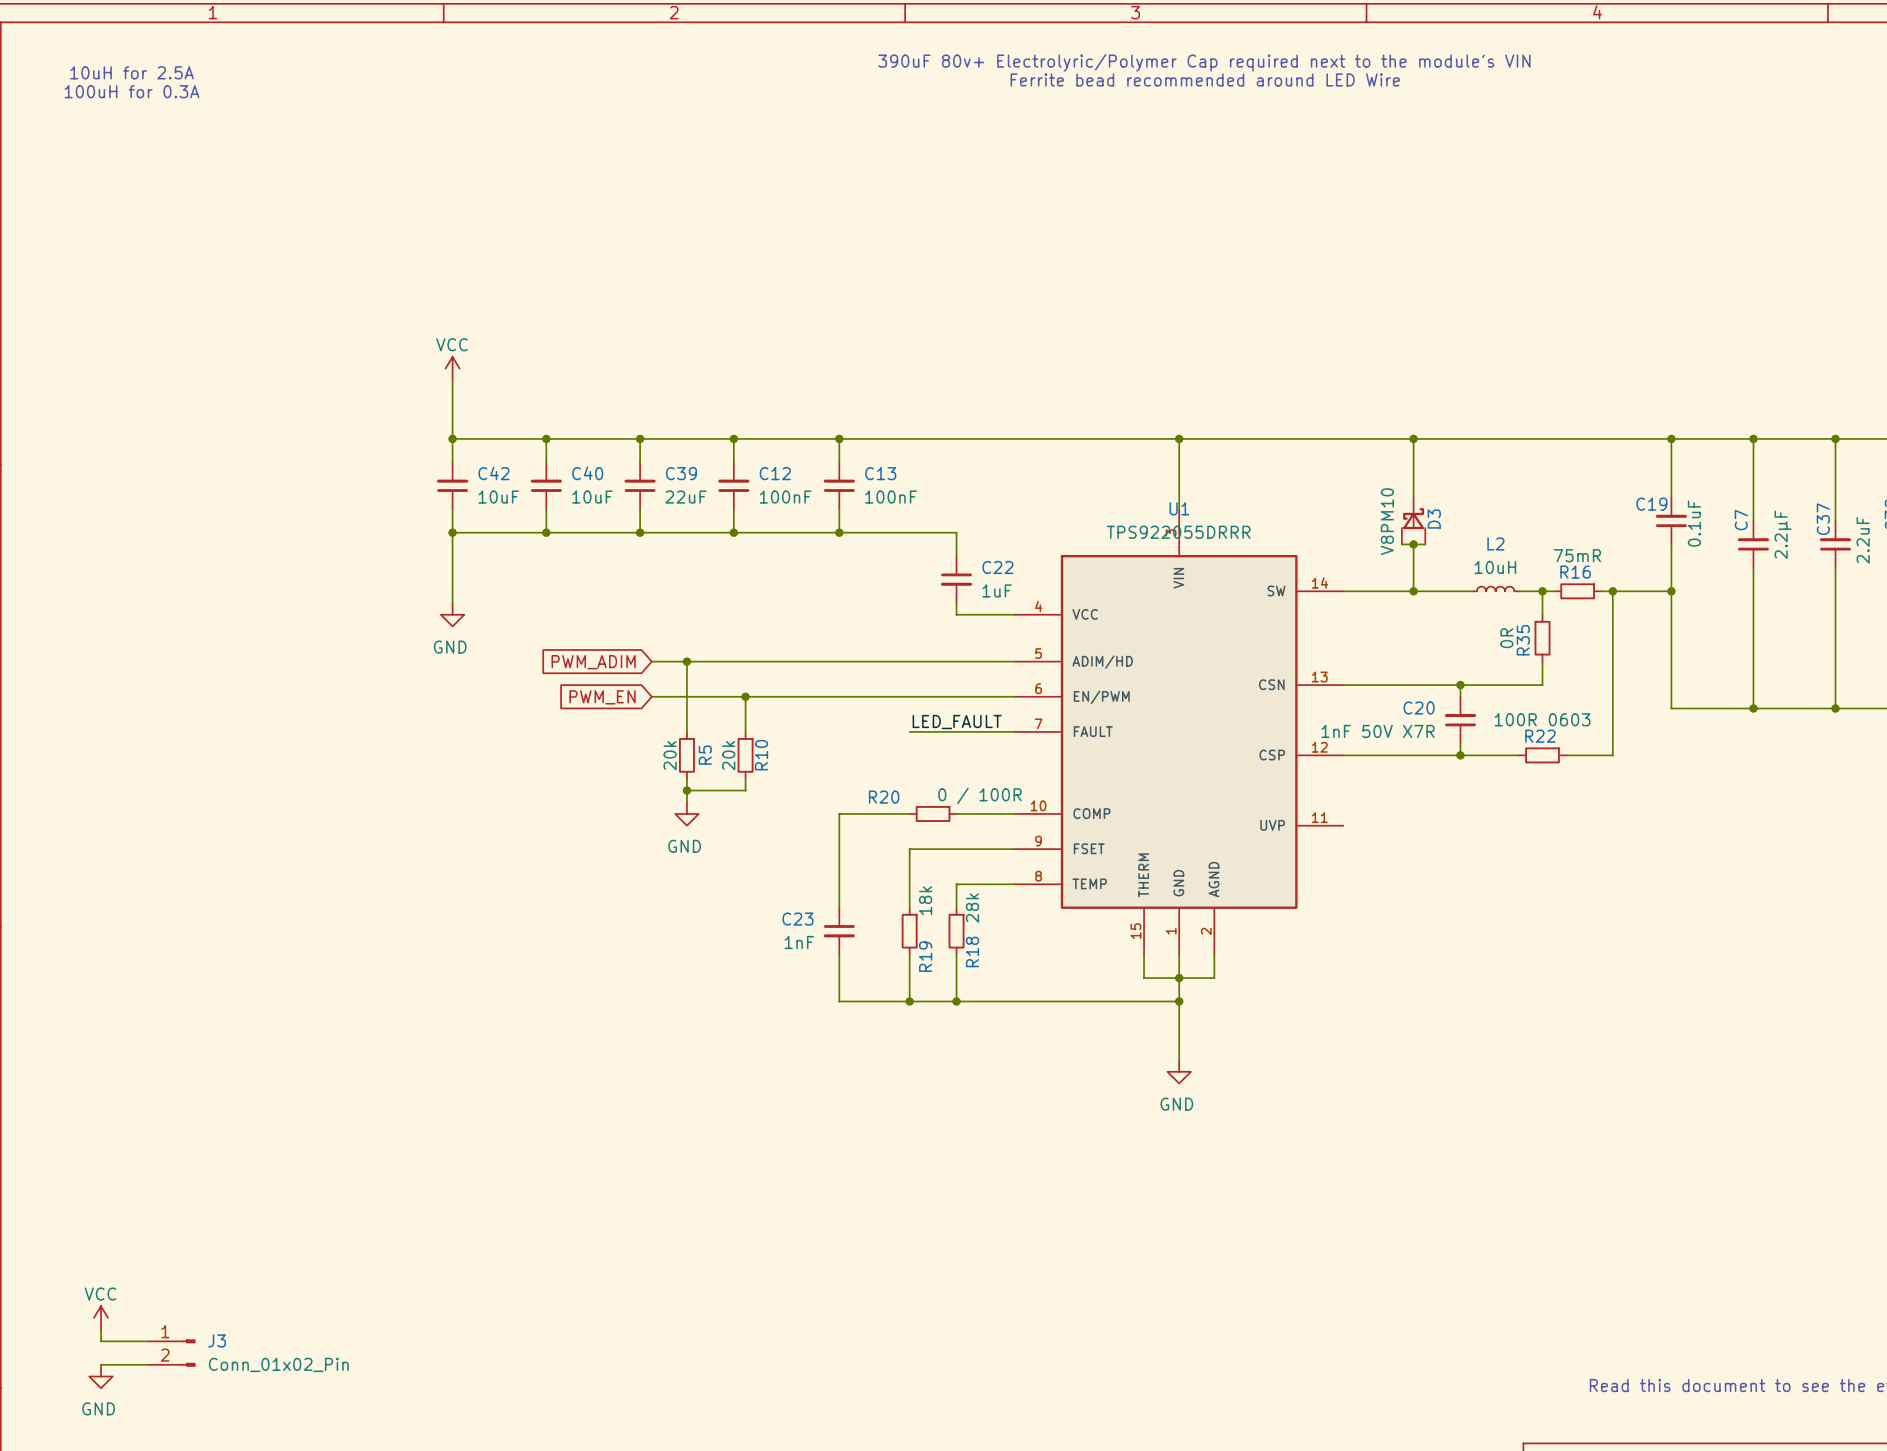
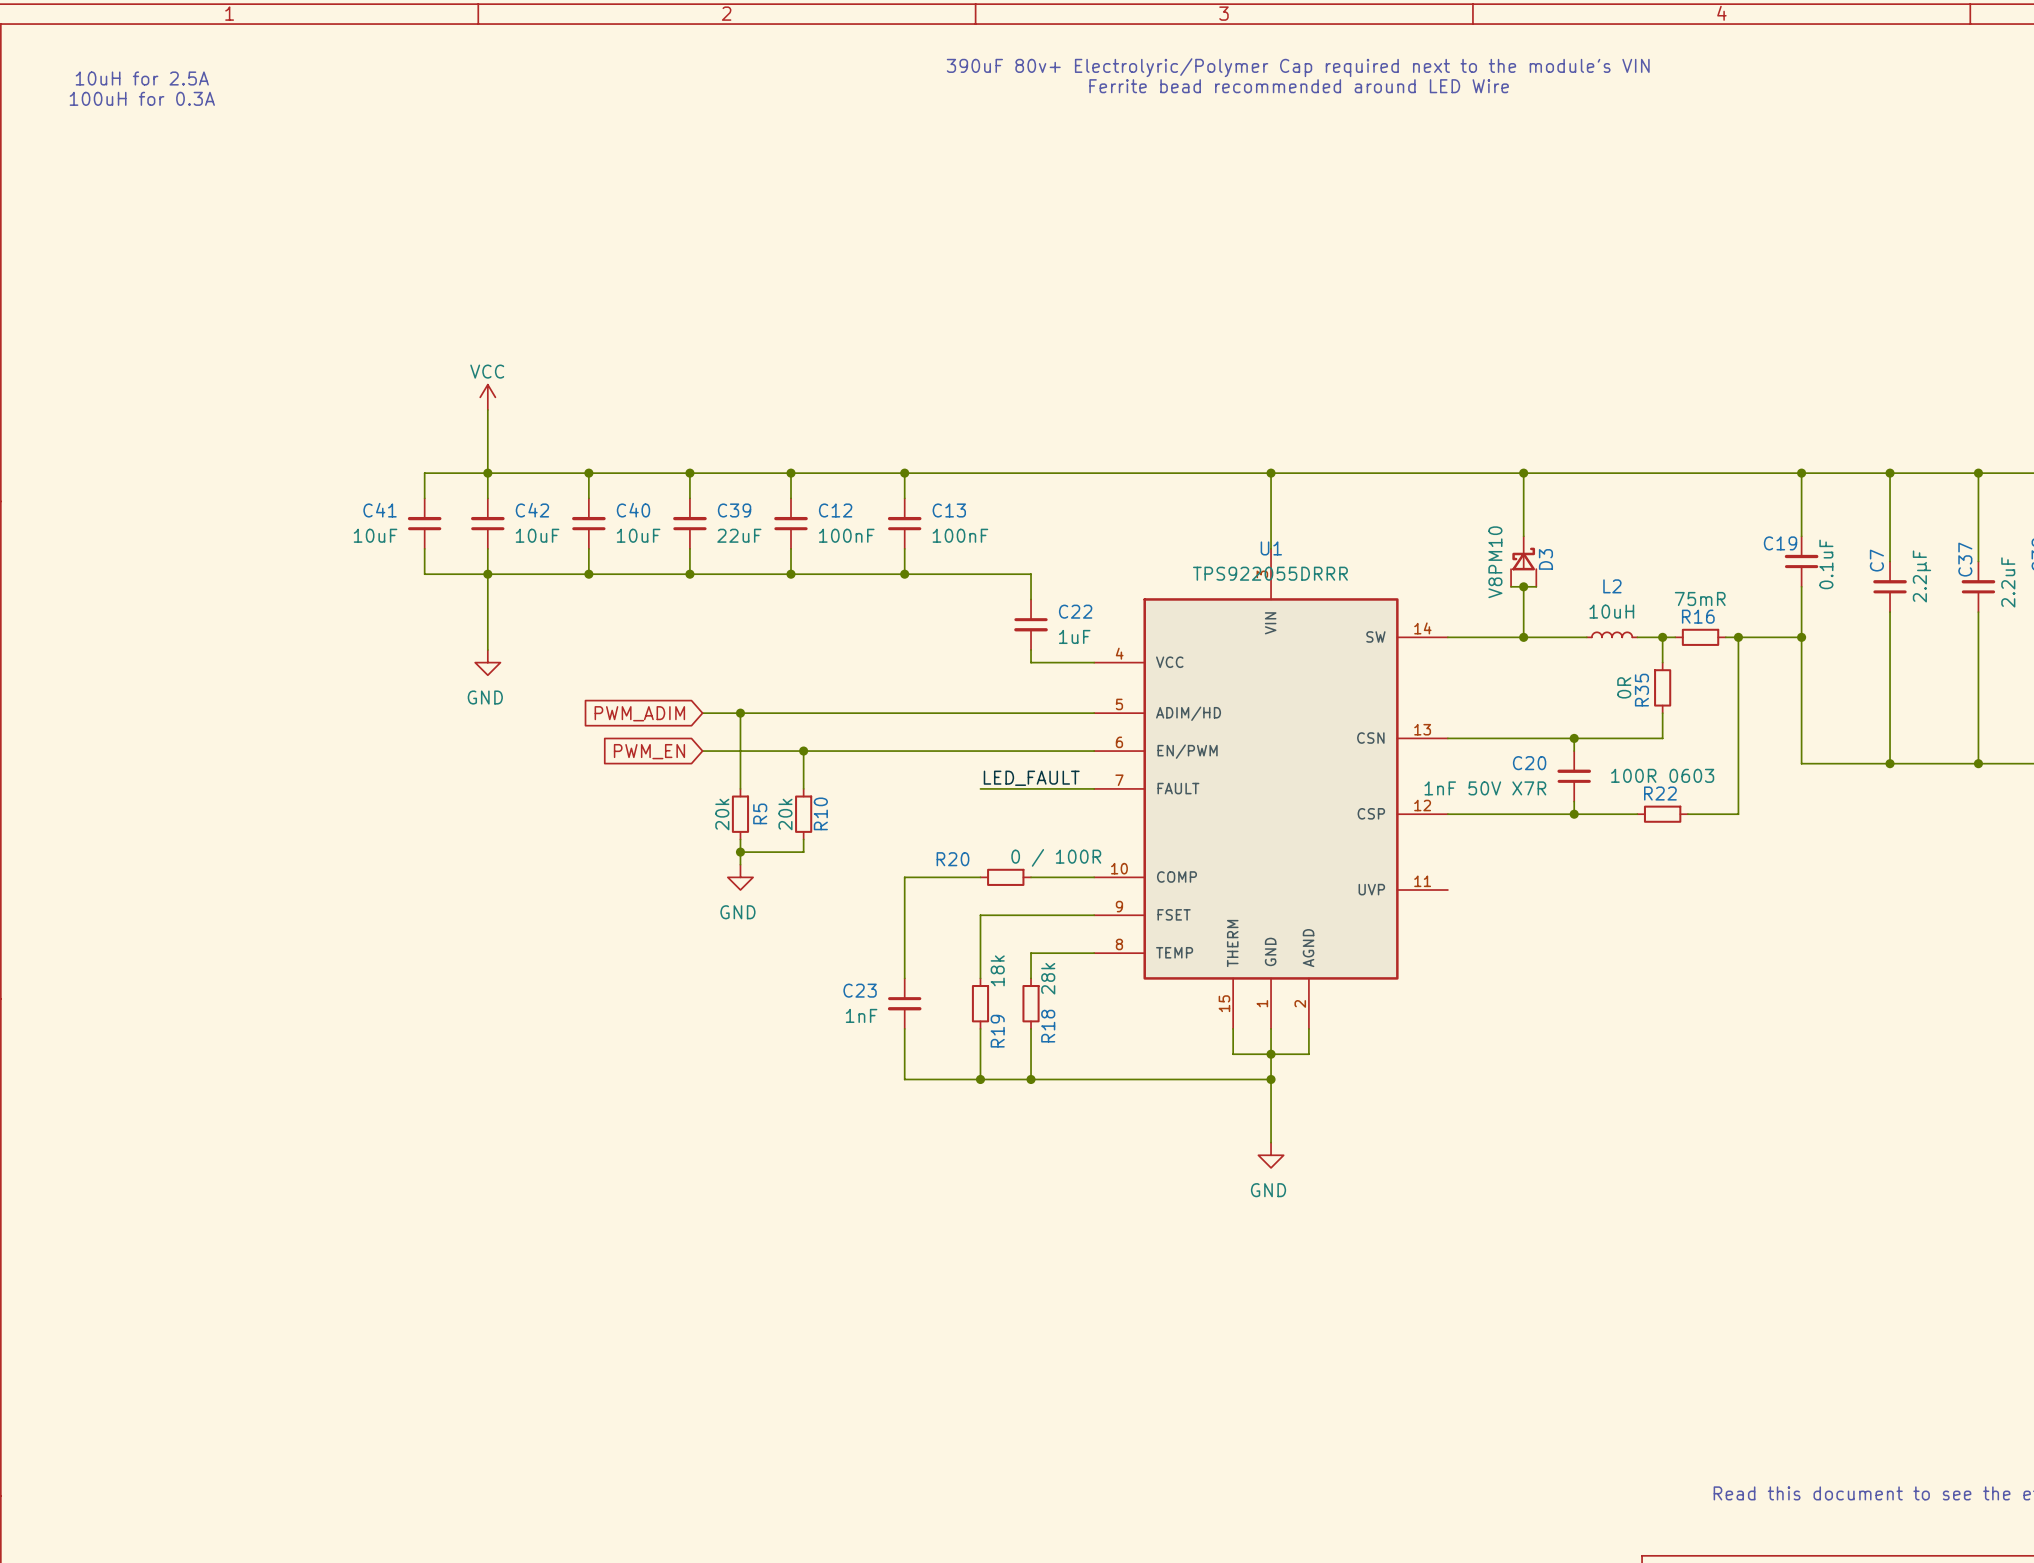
wire: none -> (487, 473) (424, 473) (424, 498)
C41: none -> 10uF (424, 523)
wire: none -> (424, 548) (424, 574) (487, 574)
power symbol: VCC (100, 1317) -> none
wire: (100, 1329) (100, 1341) (147, 1341) -> none
J3: Conn_01x02_Pin (171, 1353) -> none
wire: (100, 1364) (147, 1364) -> none
power symbol: GND (100, 1376) -> none

